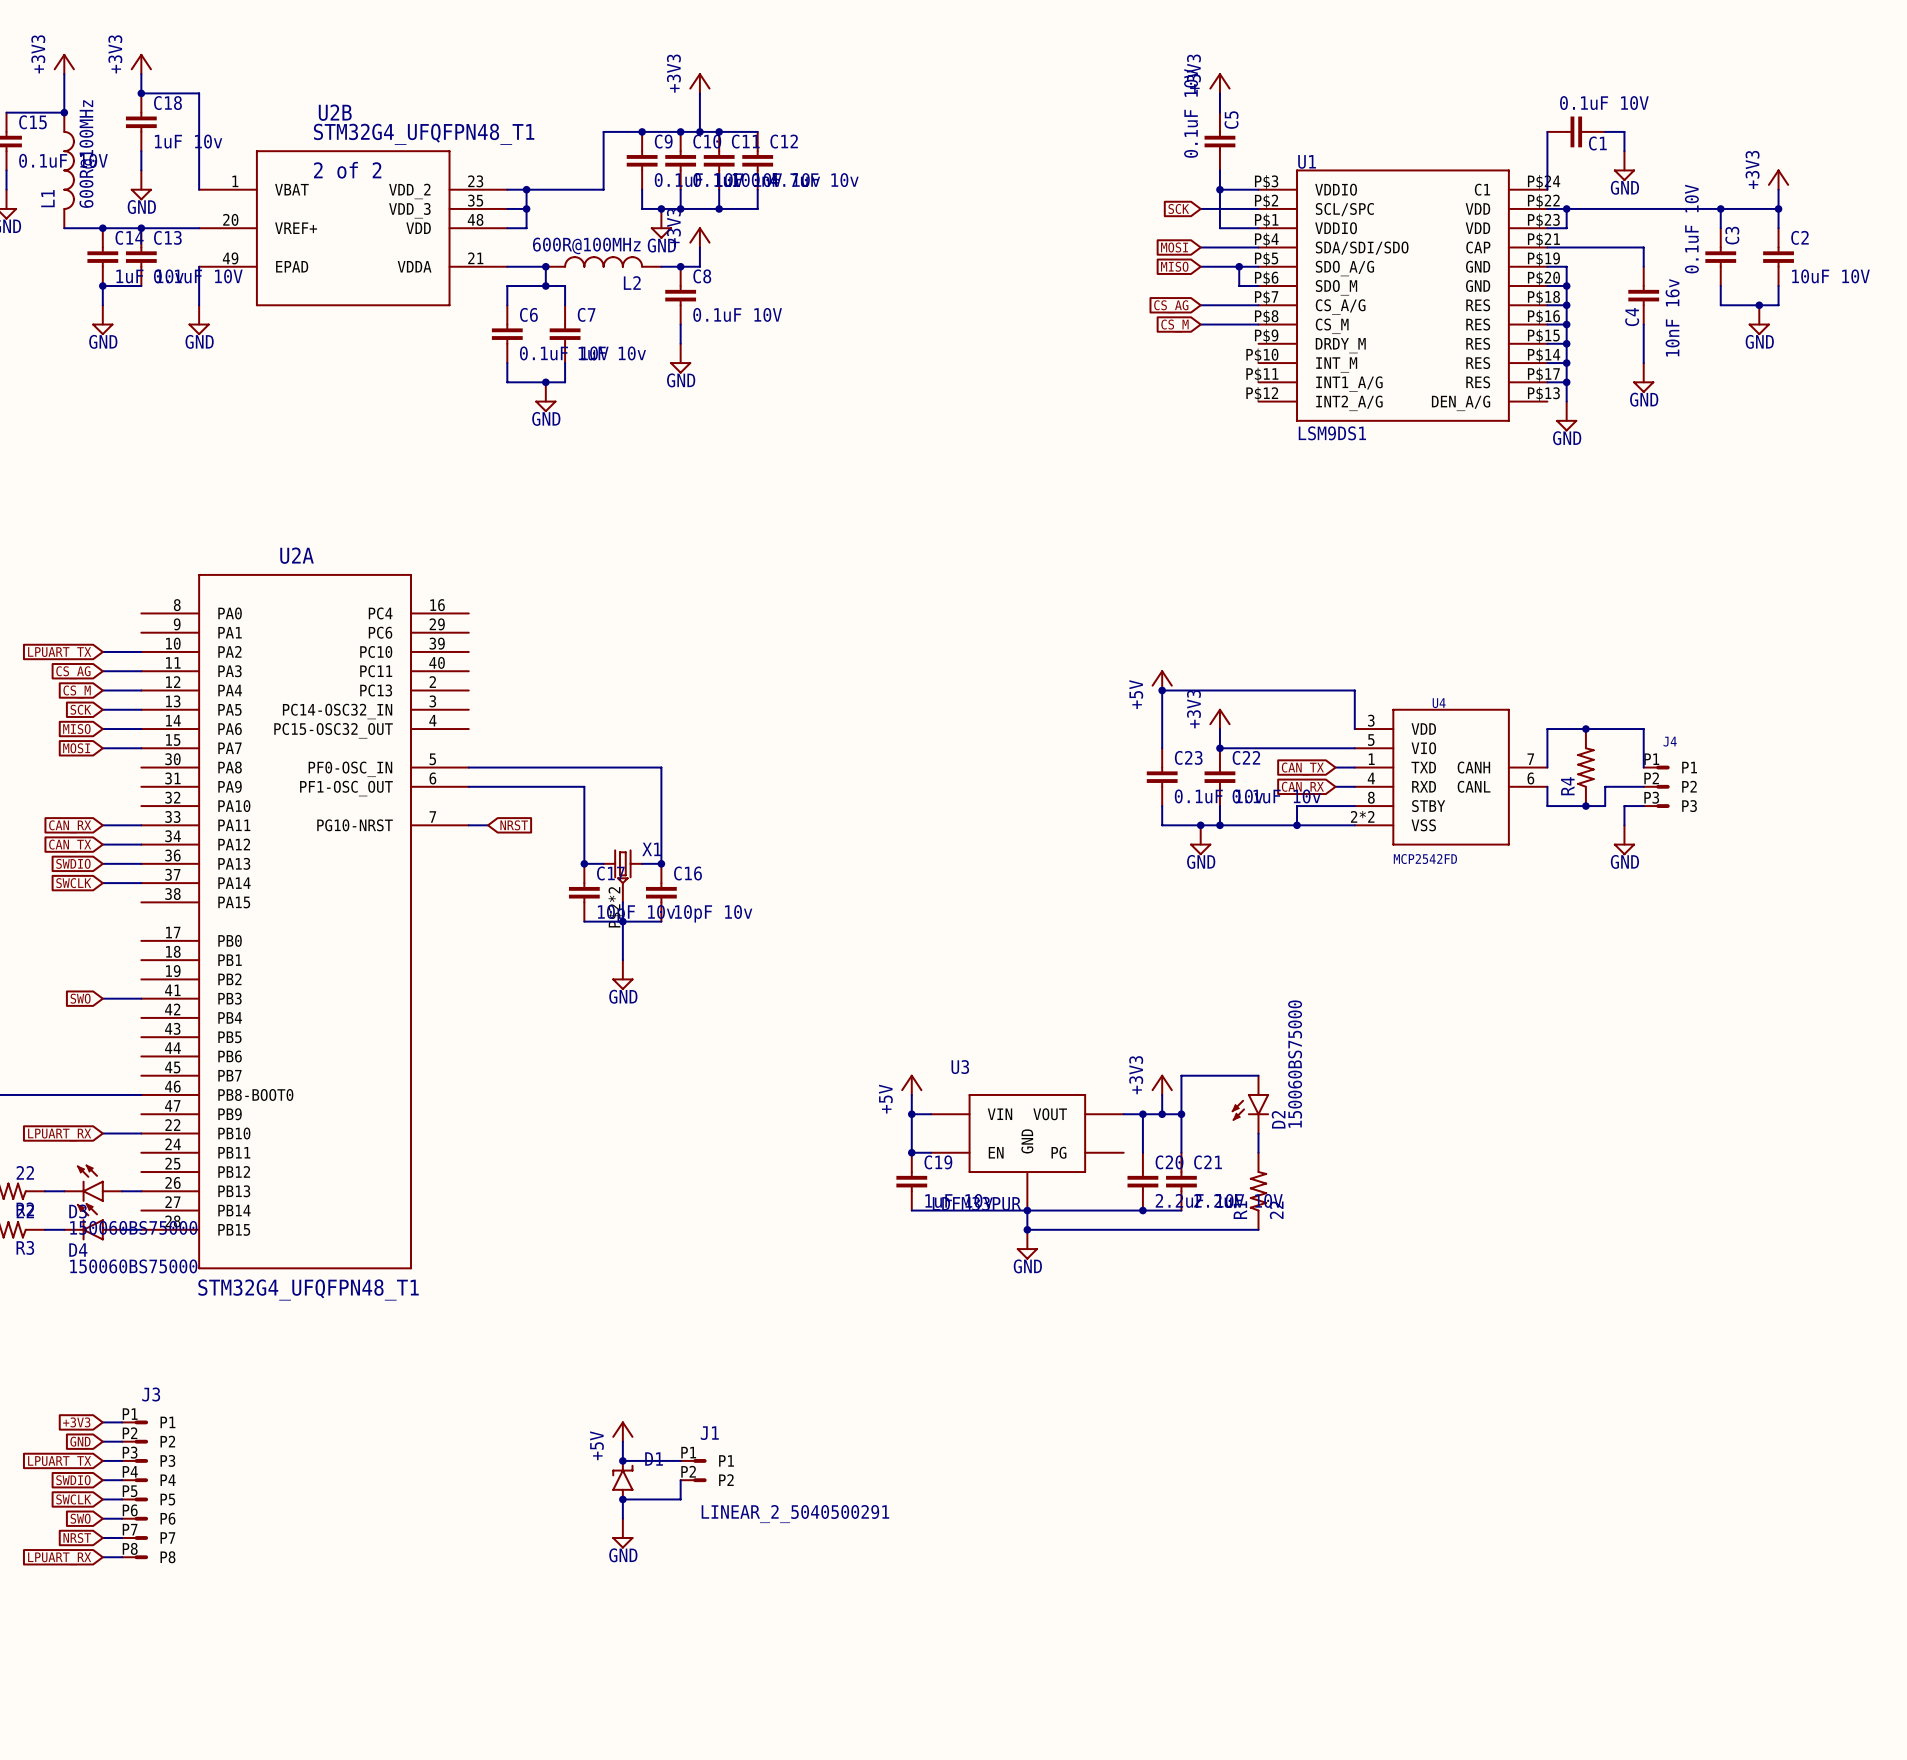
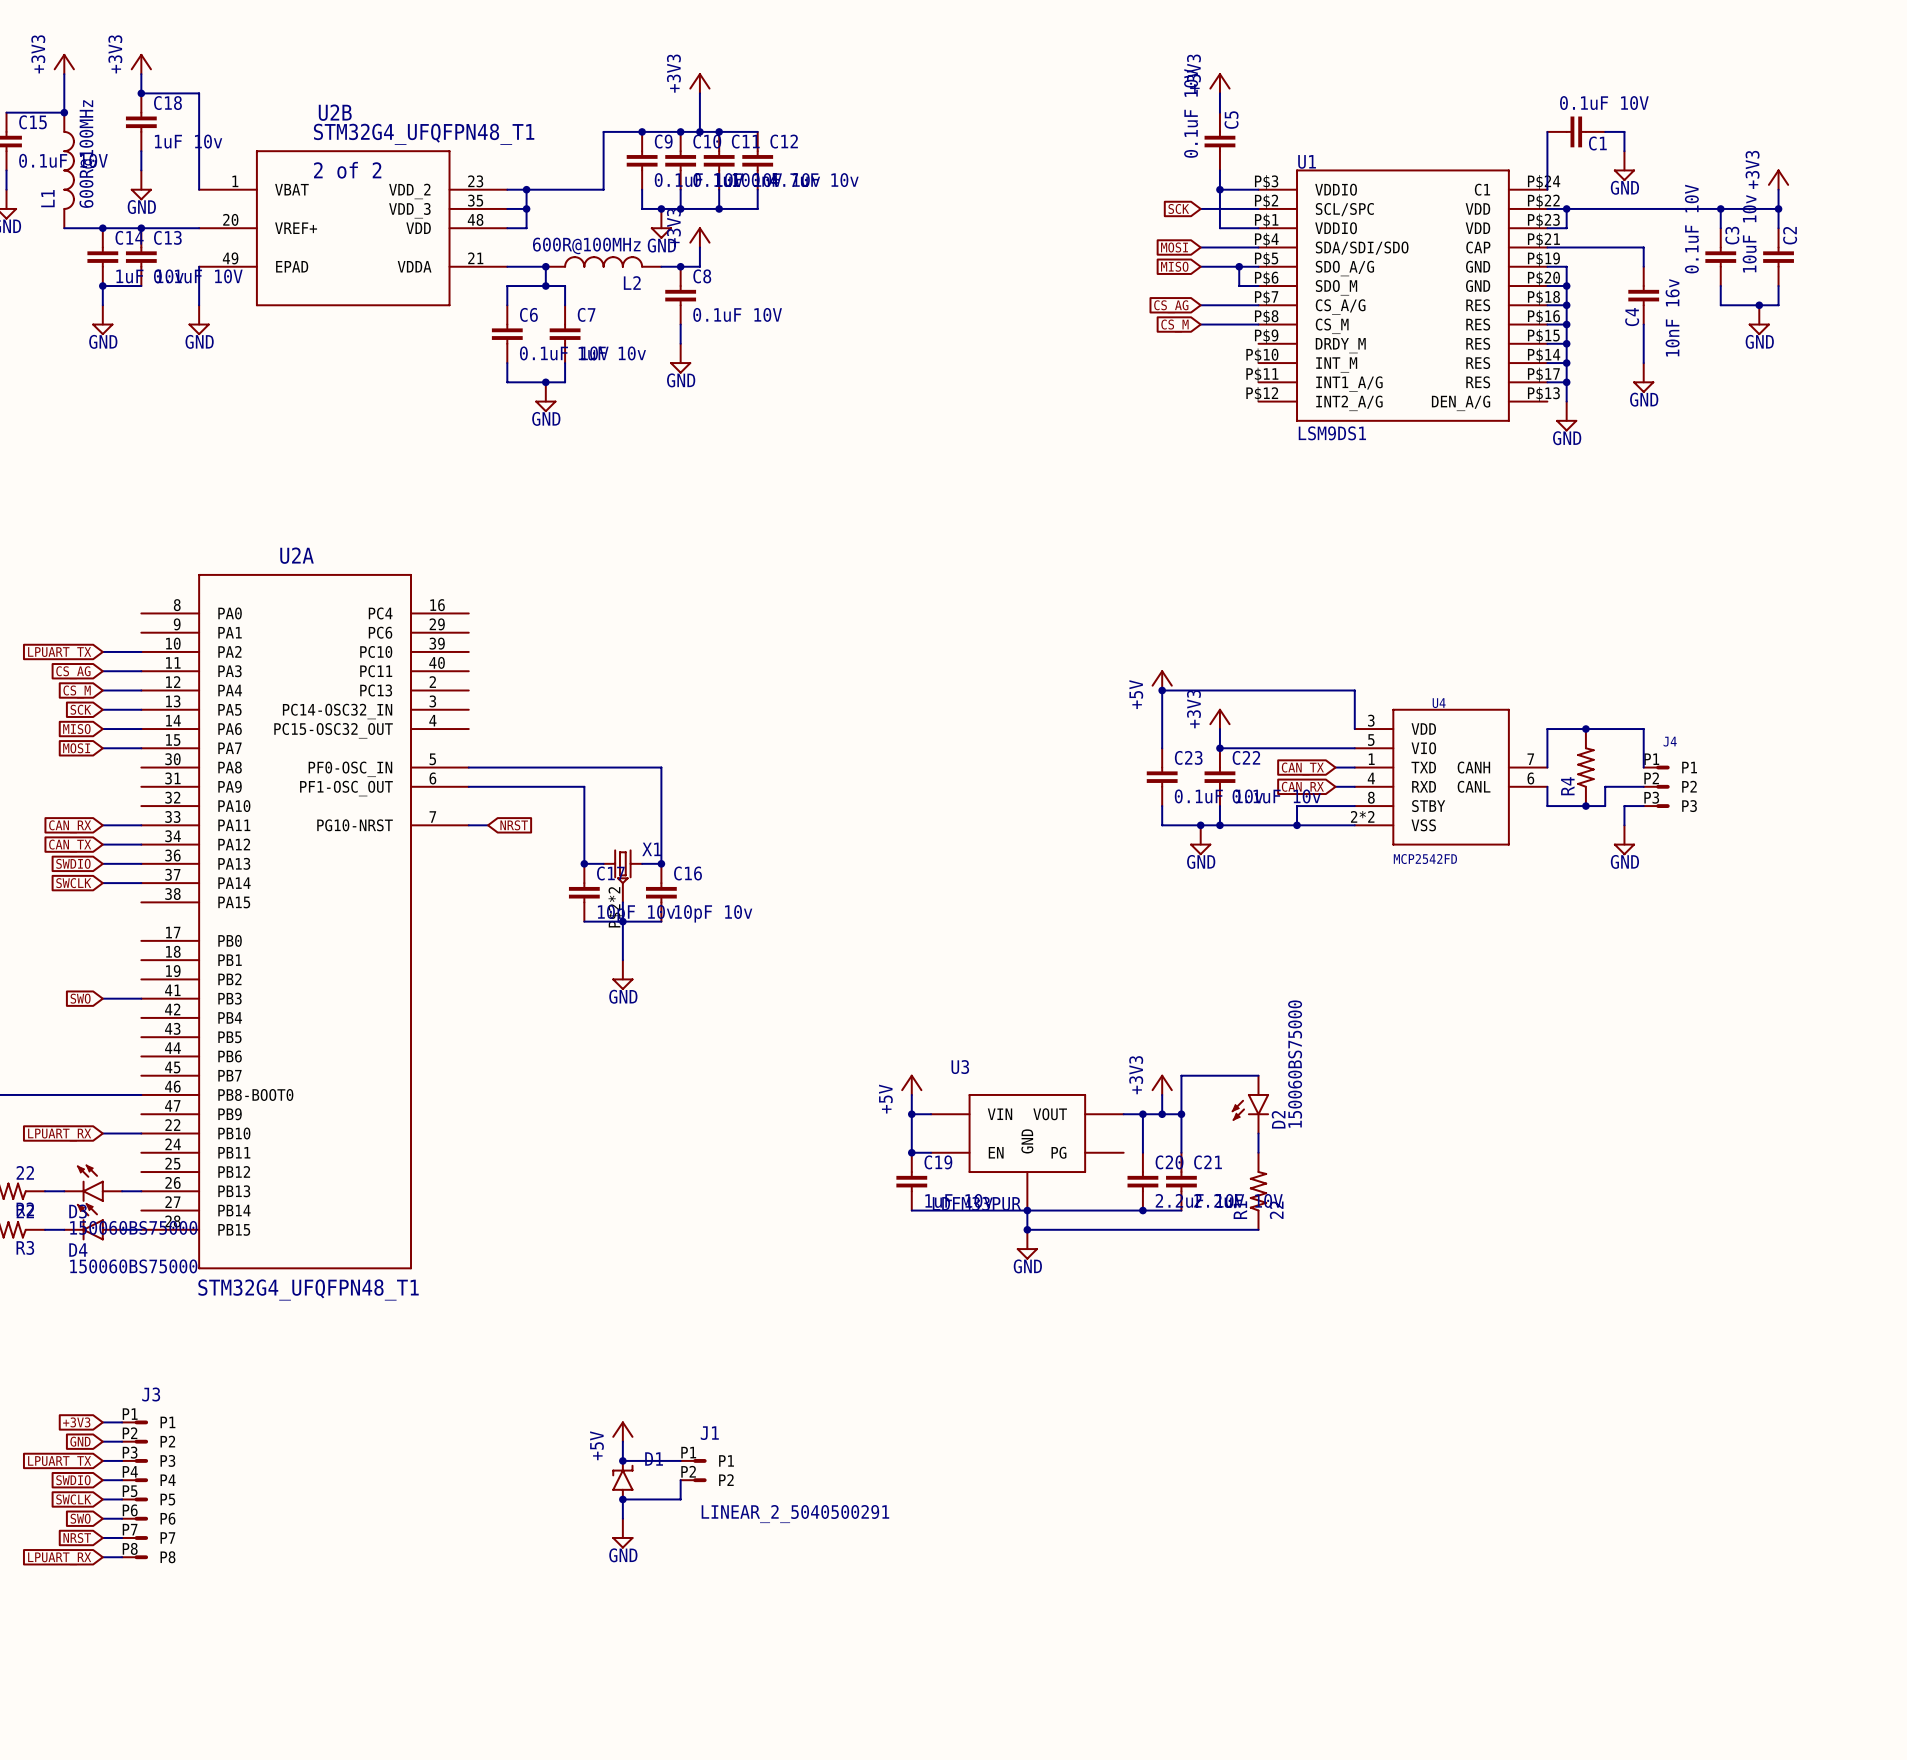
C2 name rotation: 0° (1799, 237) -> 90° counterclockwise (1790, 235)
C2 value: 10uF 10V (1830, 276) -> 10uF 10v (1749, 233)

